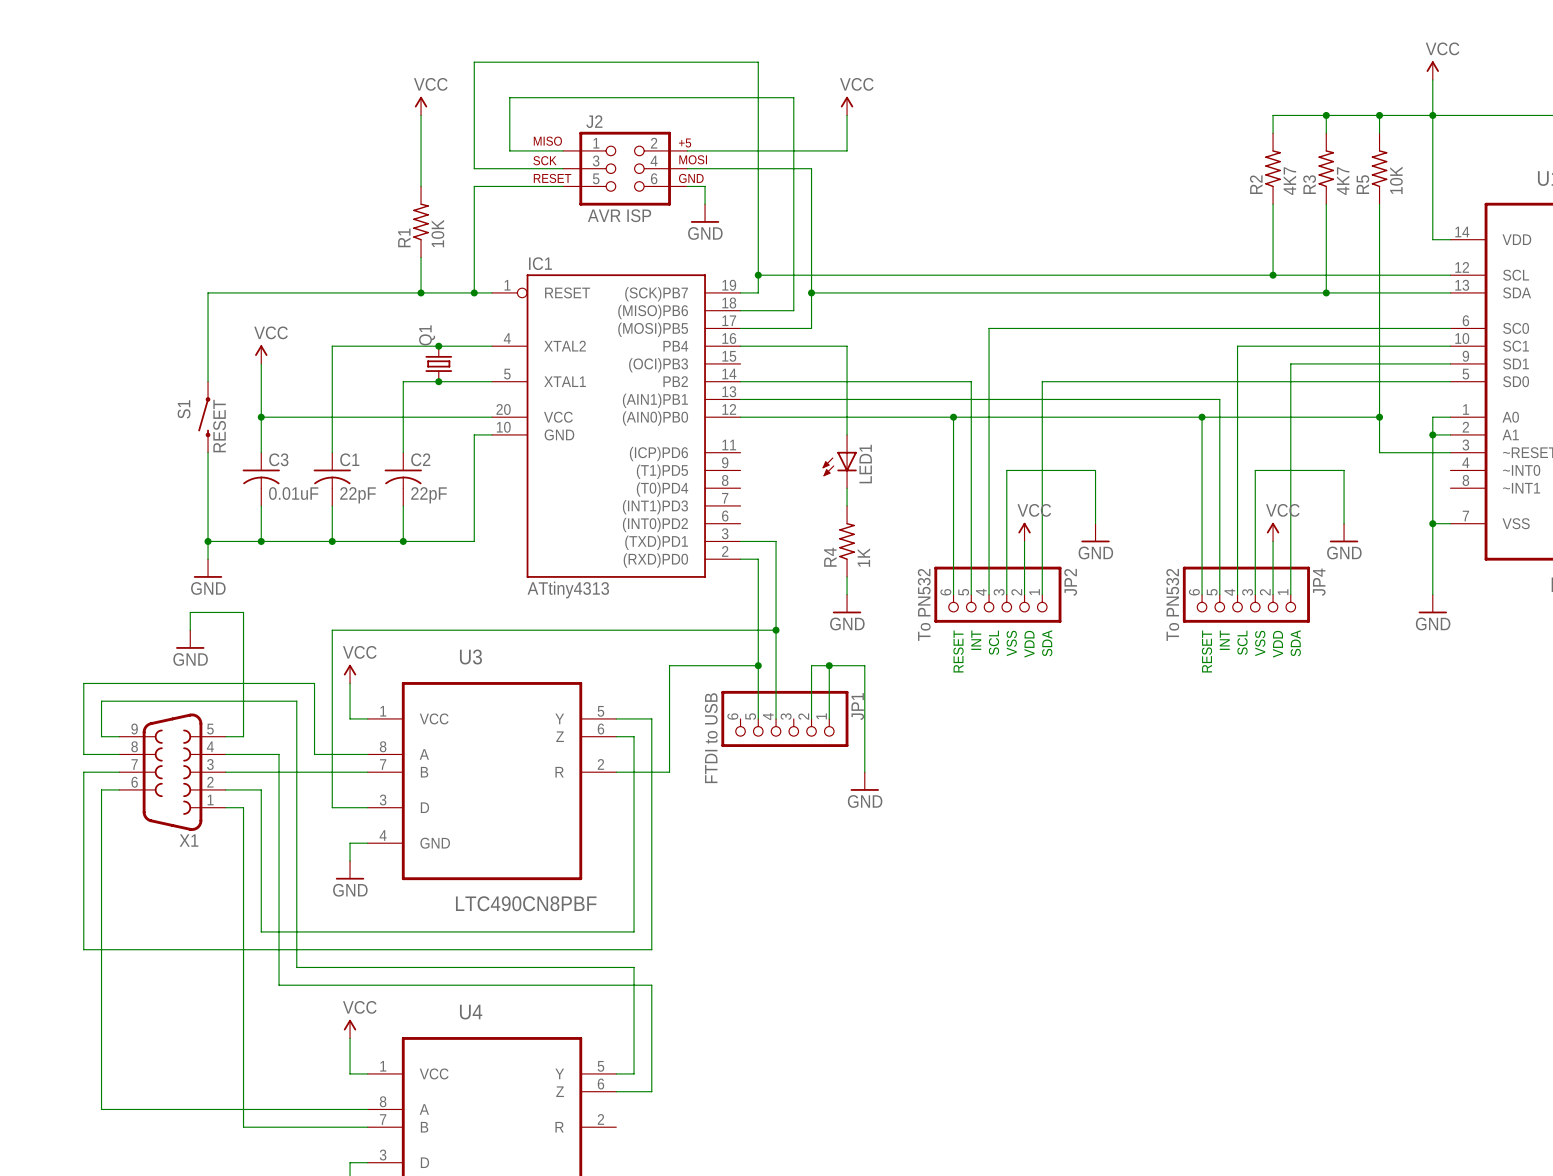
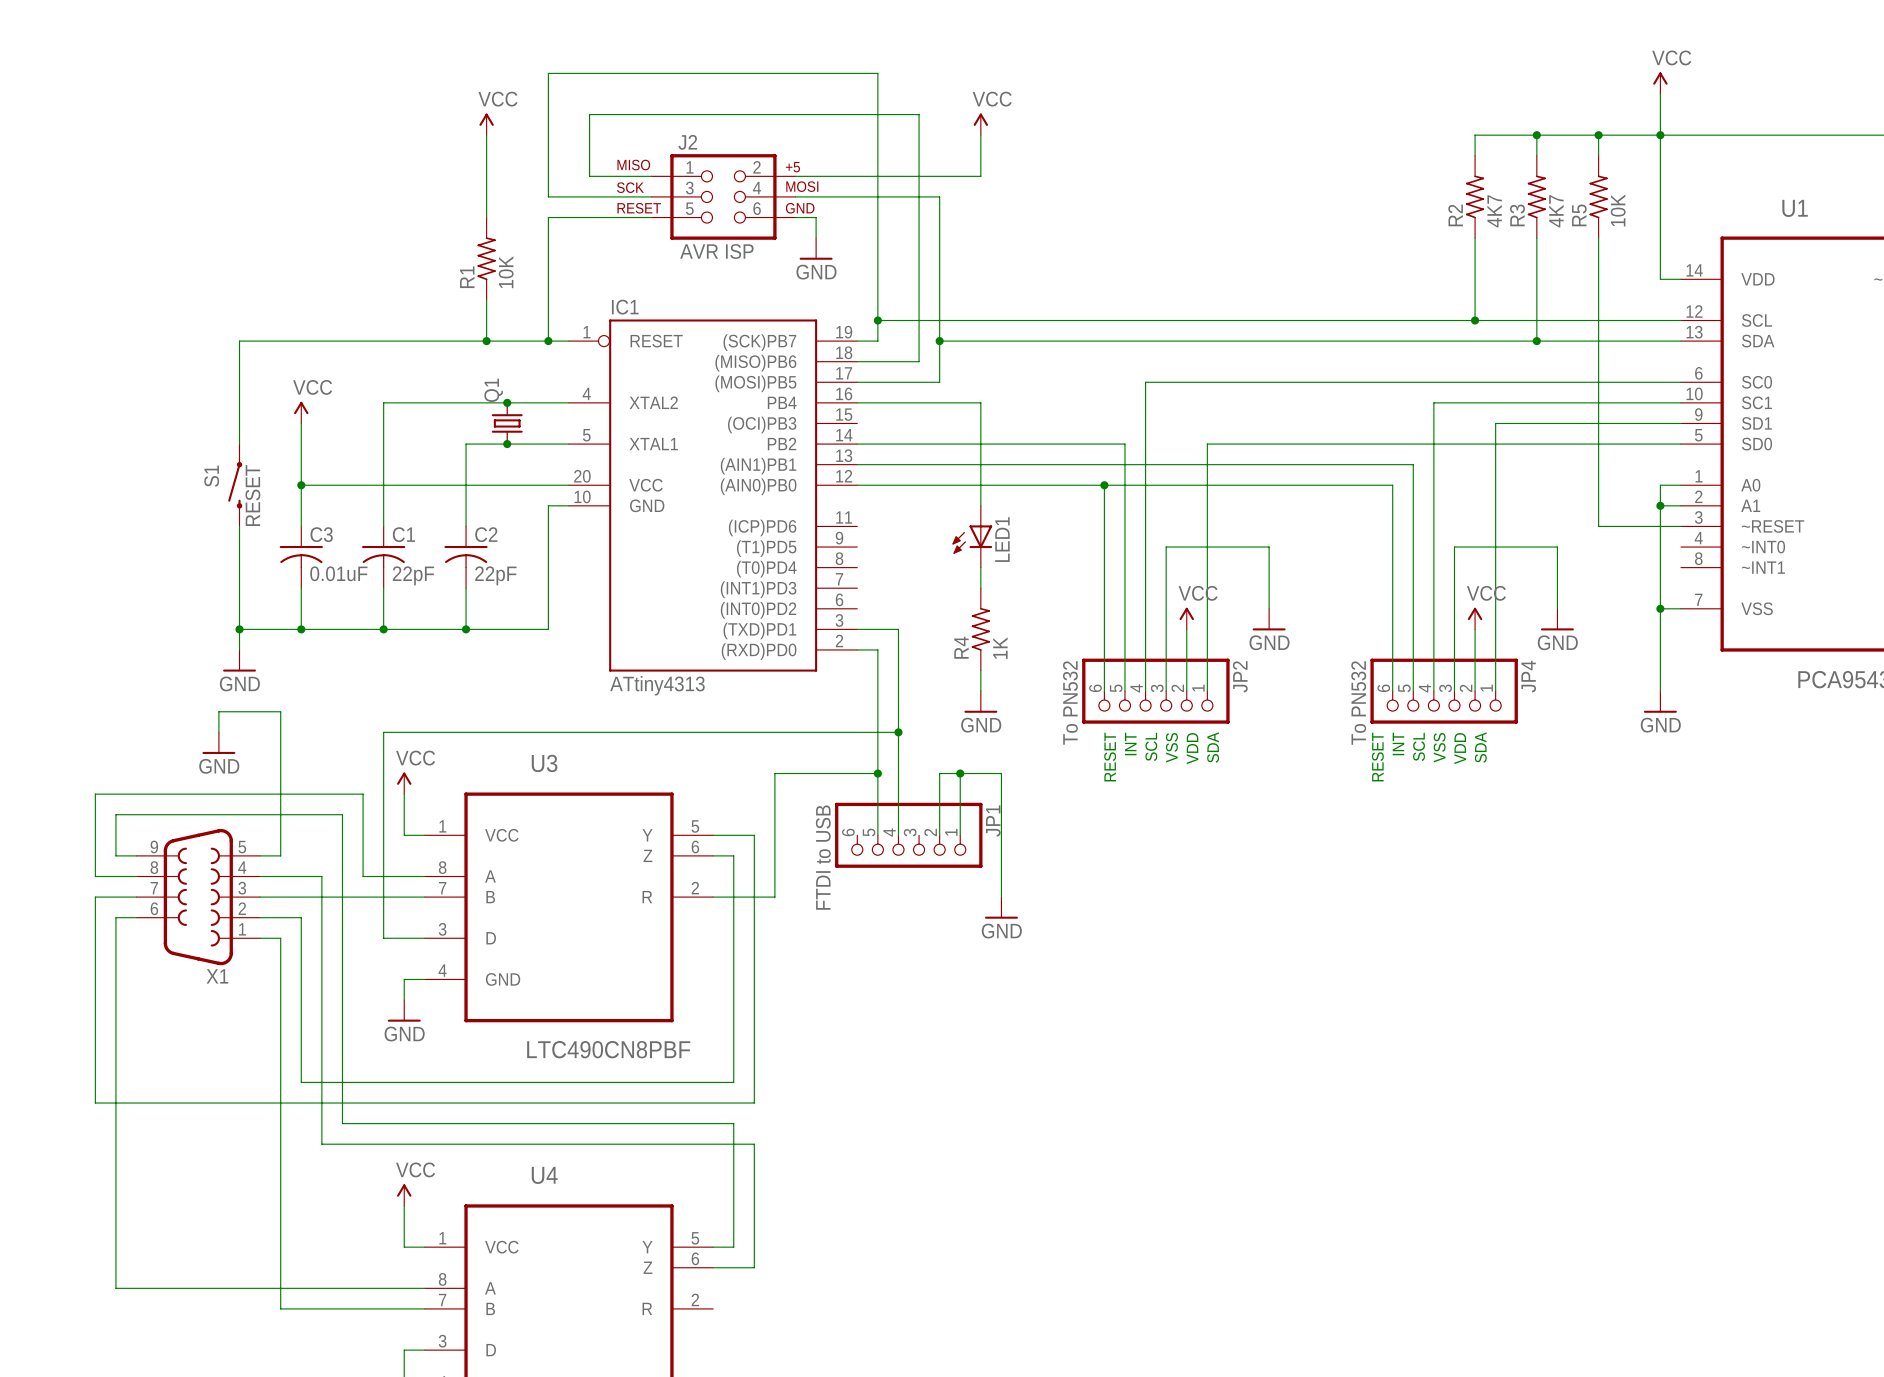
wire: (1202, 417) (1379, 417) -> none
junction: (1202, 417) -> none
junction: (1379, 417) -> none
text: INT (1224, 640) -> SCL (1419, 746)
text: SCL (1242, 642) -> VSS (1439, 747)
text: VSS (1260, 643) -> VDD (1460, 748)
text: SDA (1295, 643) -> none
text: VDD (1278, 644) -> SDA (1480, 747)
text: none -> RESET (1377, 757)
text: RESET (1207, 651) -> INT (1398, 743)

